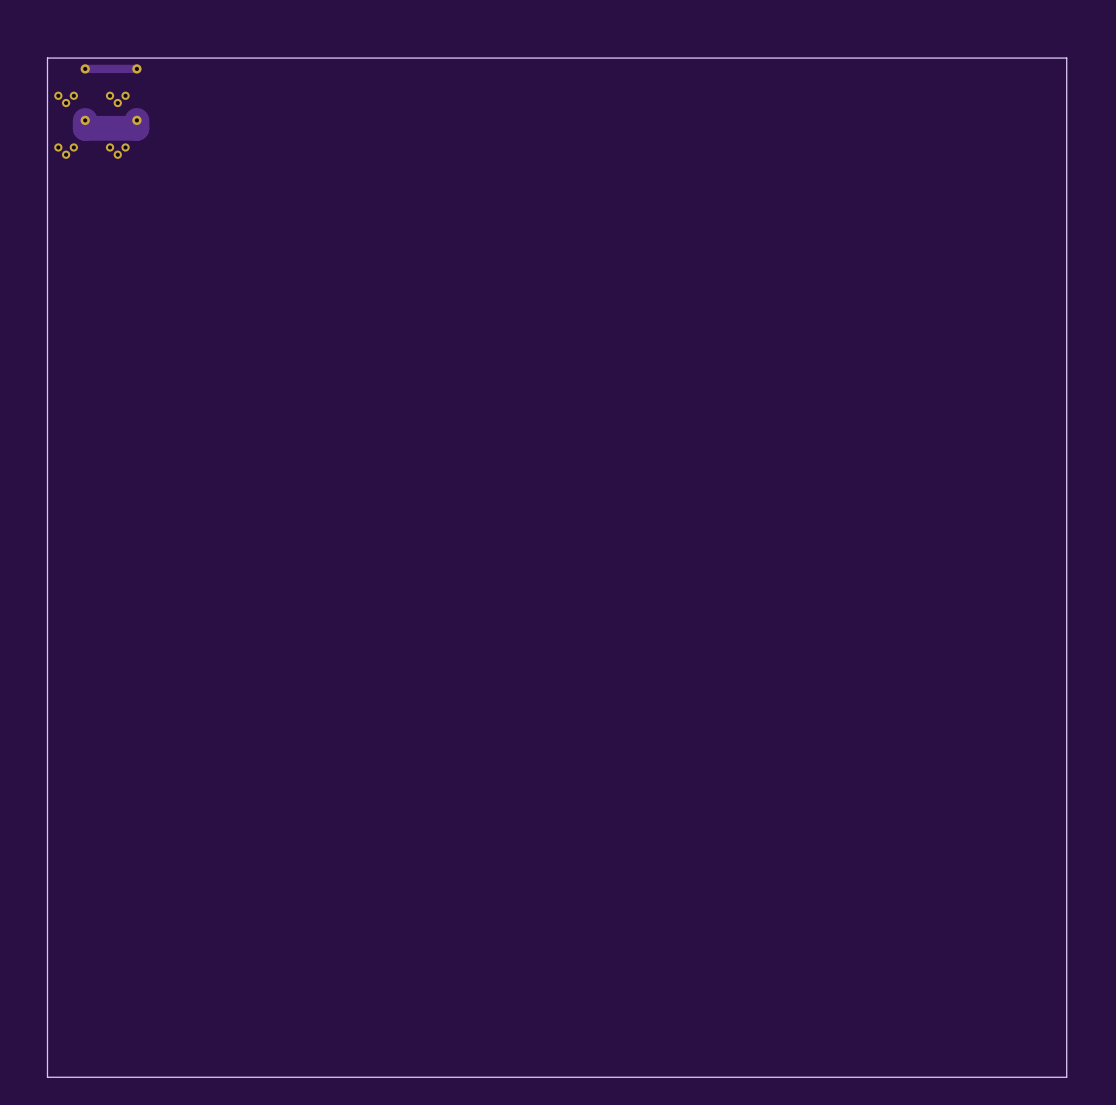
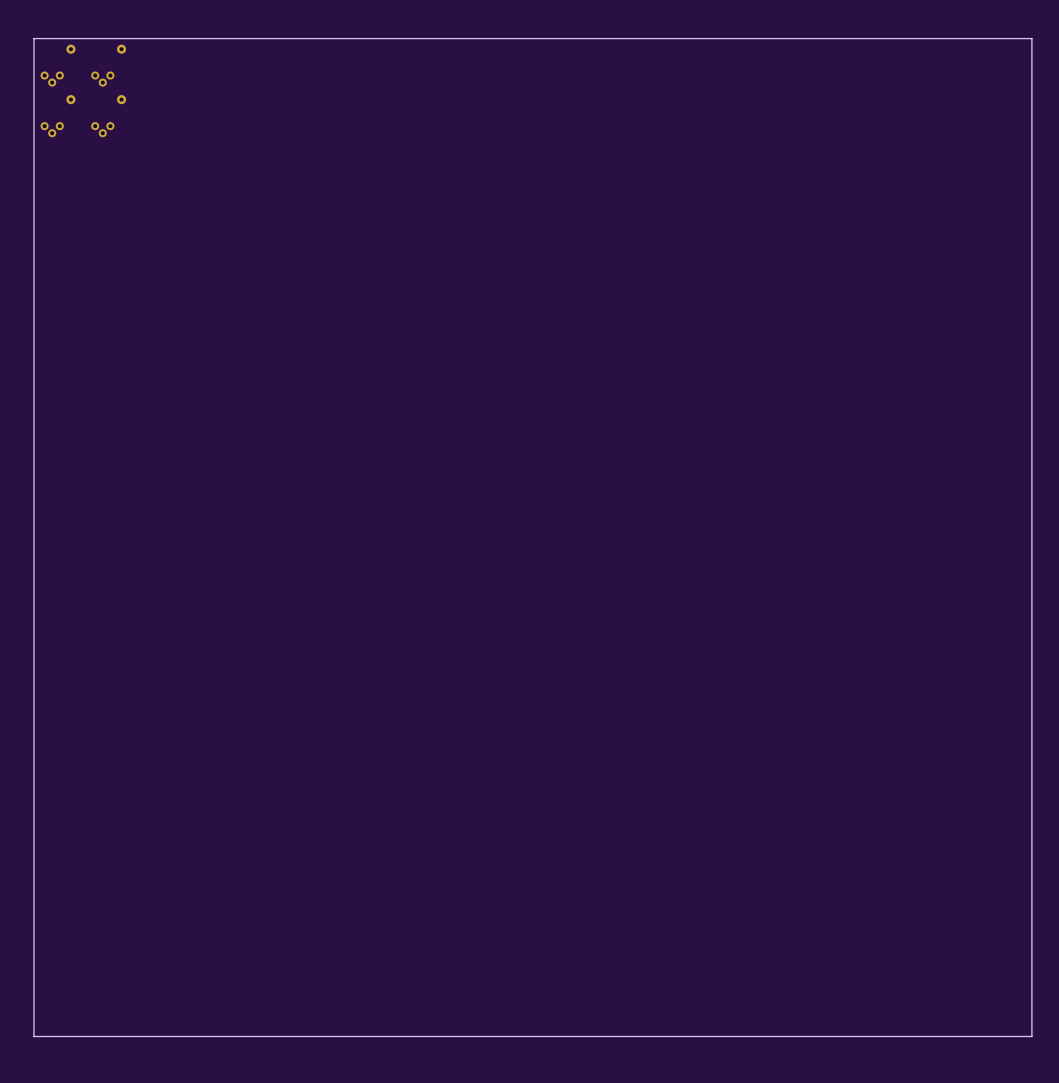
track: (85, 68) (136, 68) -> none
track: (85, 120) (85, 128) (136, 128) (136, 120) -> none

